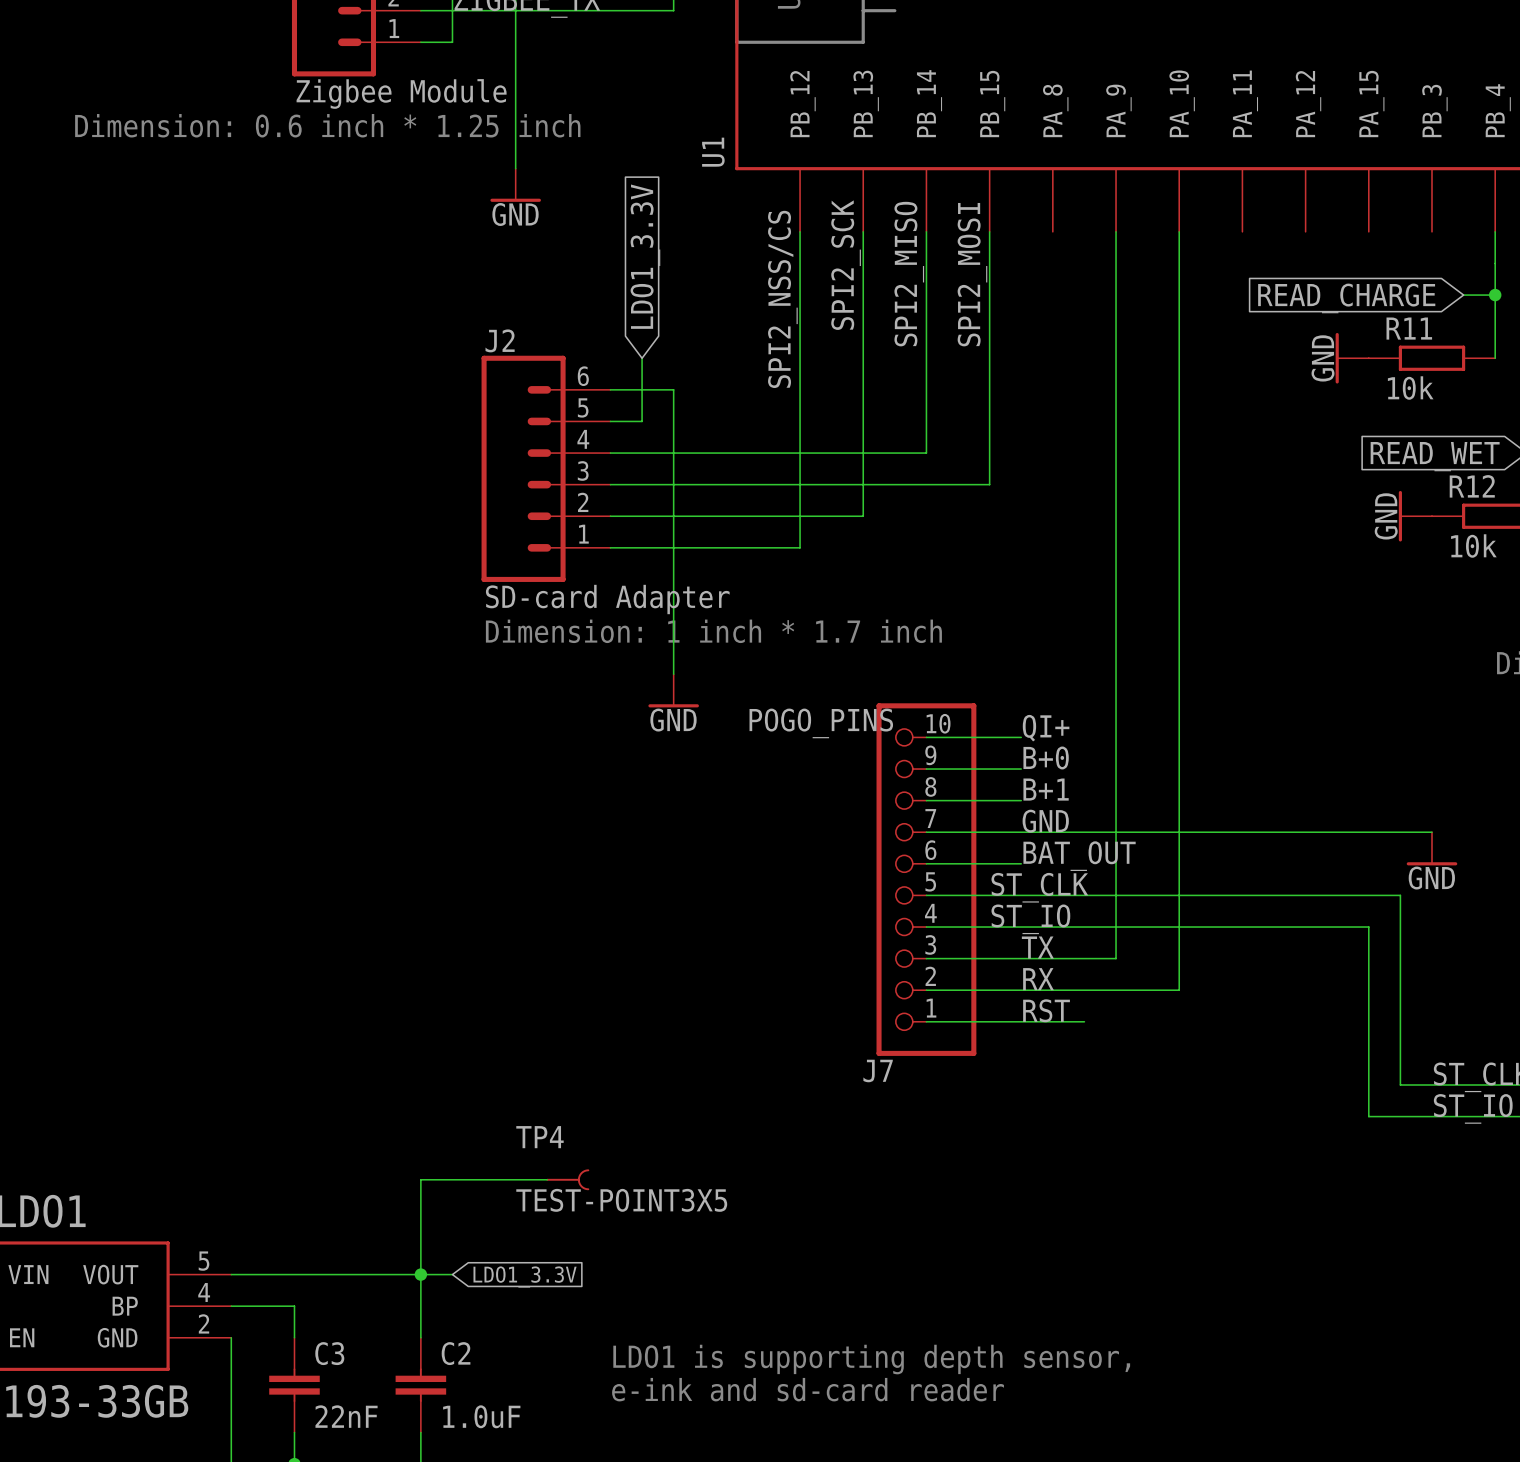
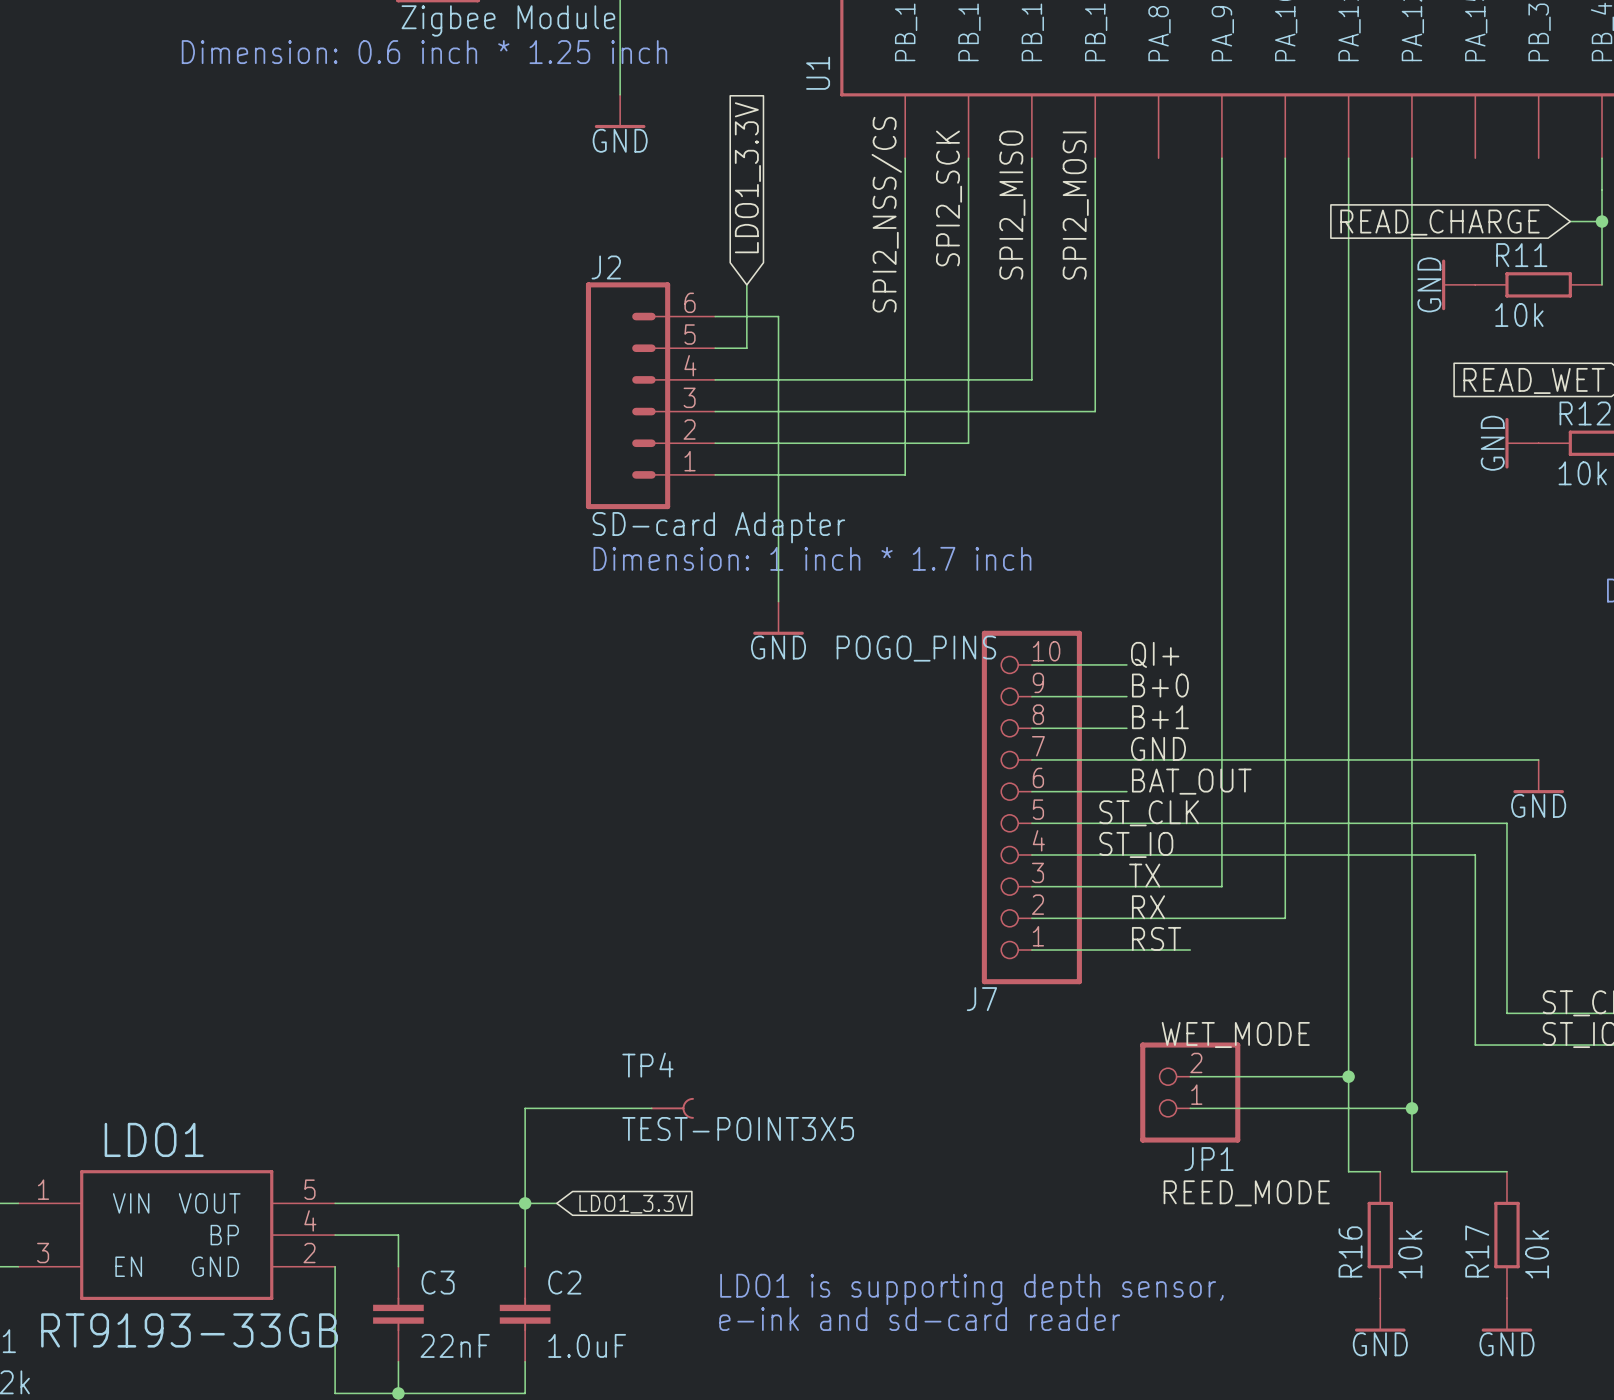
wire: none -> (1348, 158) (1348, 1171) (1380, 1171)
wire: none -> (1411, 158) (1411, 1171) (1506, 1171)
label: none -> WET_MODE (1235, 1034)
wire: none -> (1190, 1076) (1348, 1076)
junction: none -> (1348, 1076)
JP1: none -> (1190, 1092)
wire: none -> (1190, 1108) (1411, 1108)
junction: none -> (1411, 1108)
label: none -> REED_MODE (1246, 1193)
R16: none -> 10k (1380, 1235)
R17: none -> 10k (1506, 1235)
power symbol: none -> GND (1380, 1315)
power symbol: none -> GND (1506, 1315)

